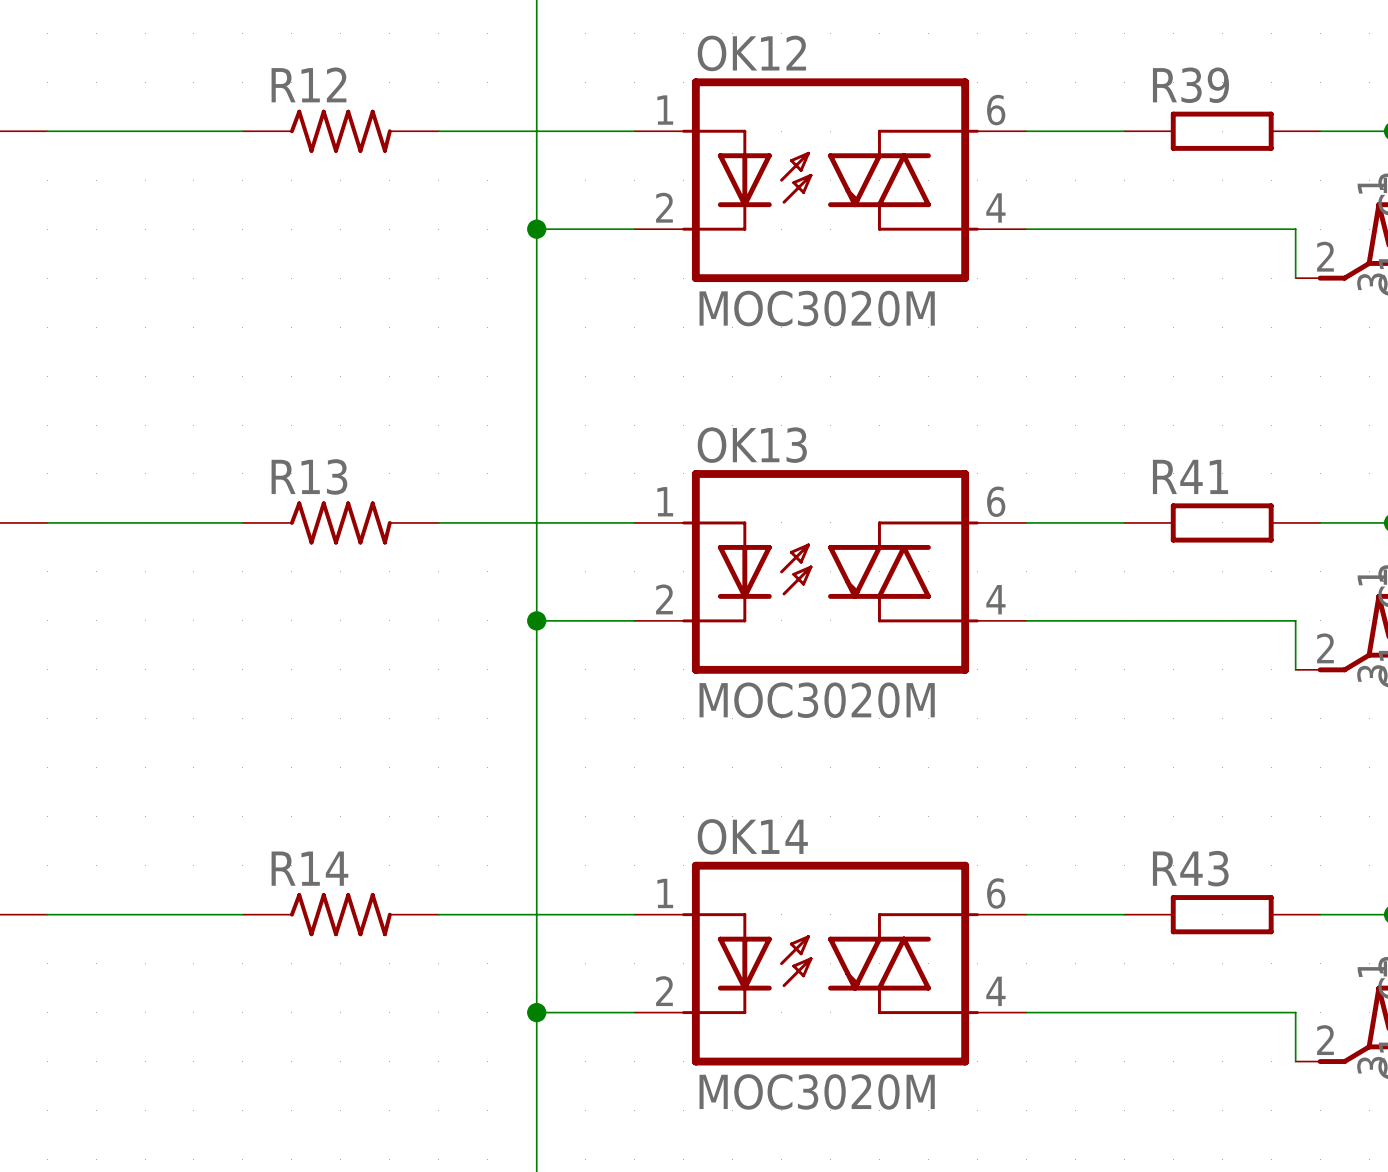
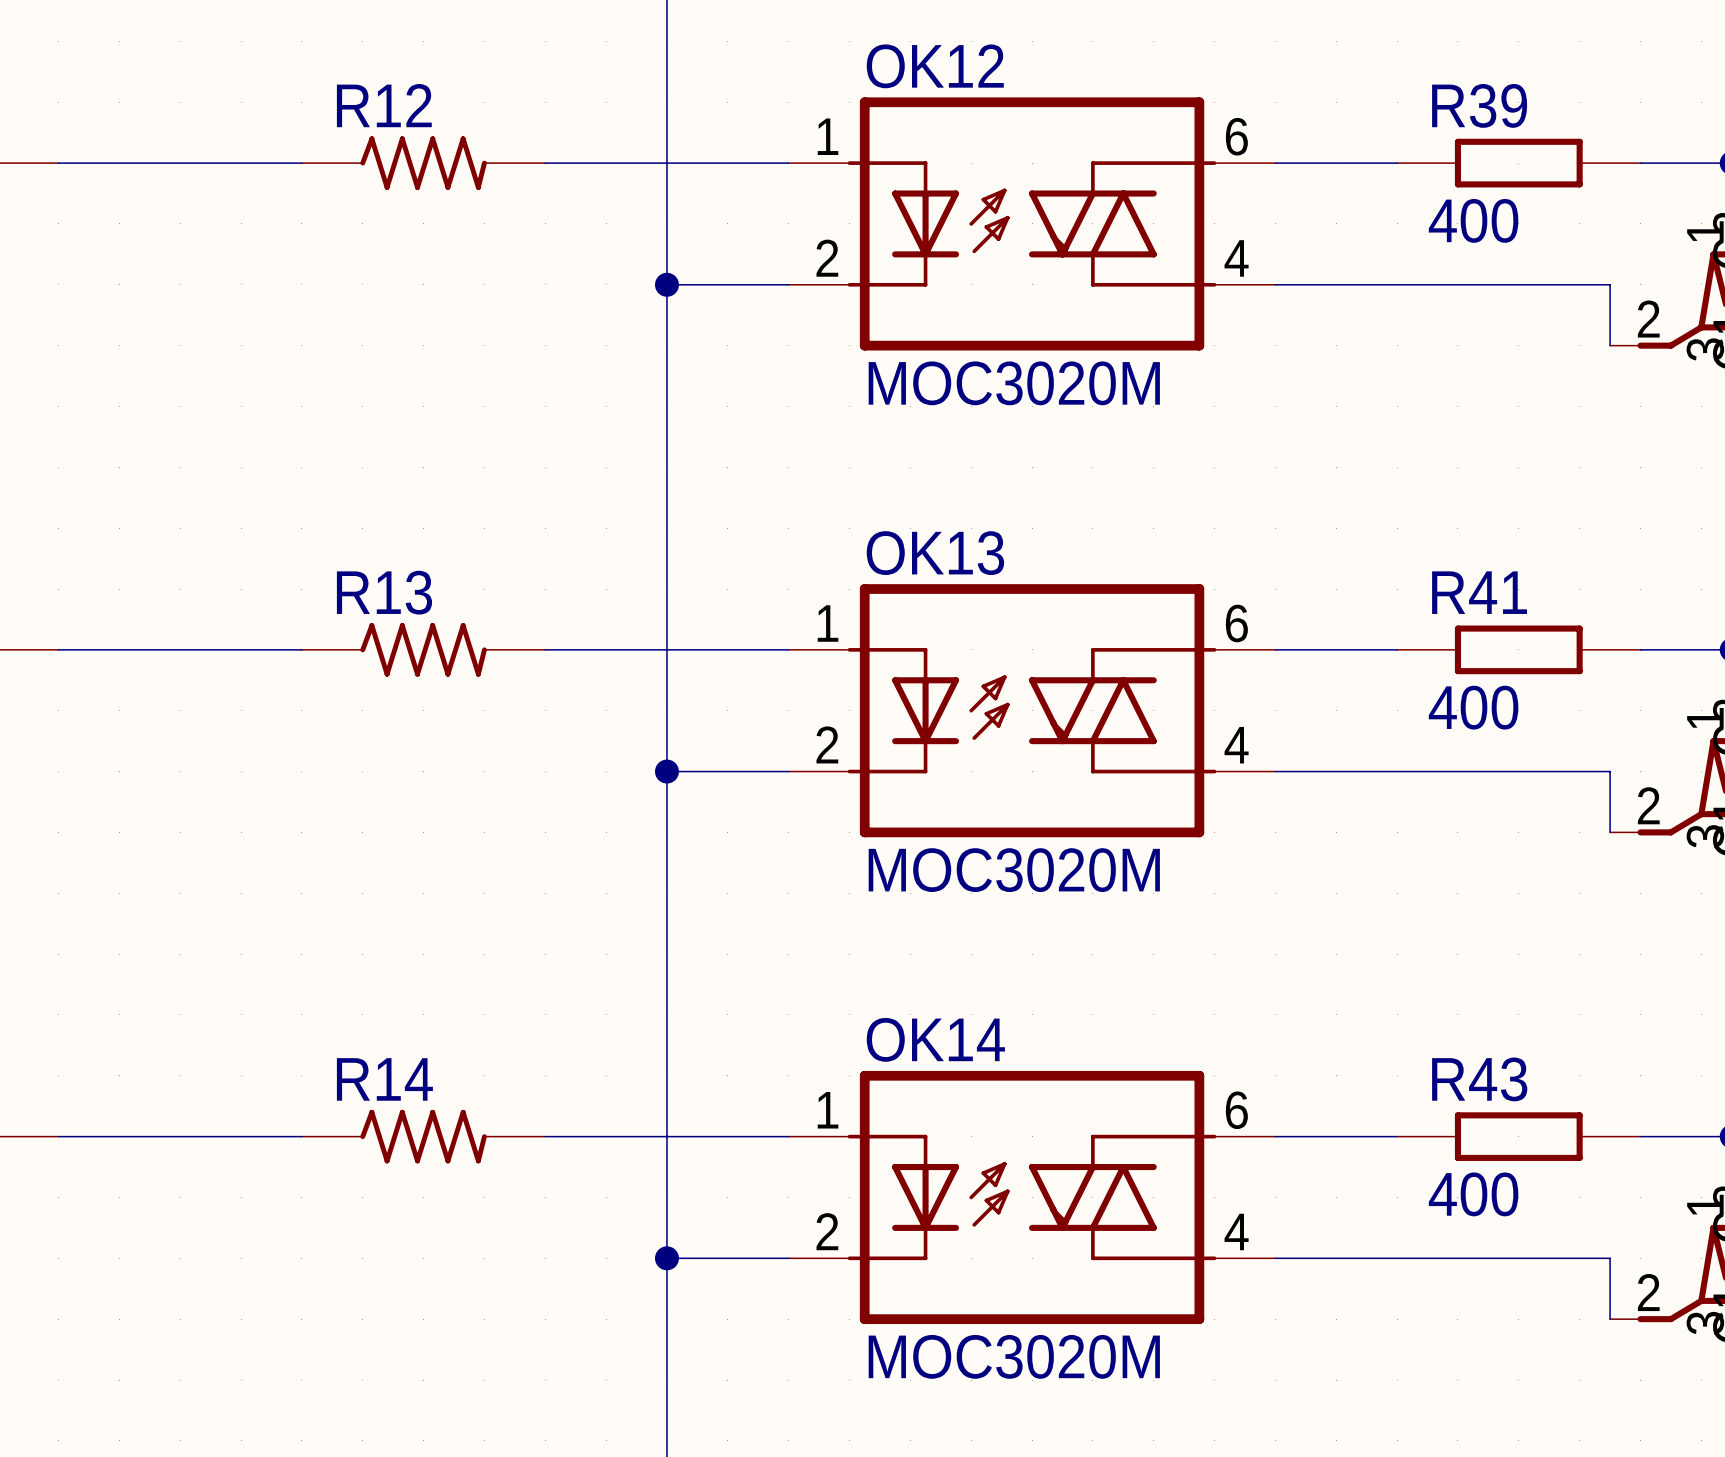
R39 value: none -> 400 (1473, 220)
R41 value: none -> 400 (1473, 707)
R43 value: none -> 400 (1473, 1194)

